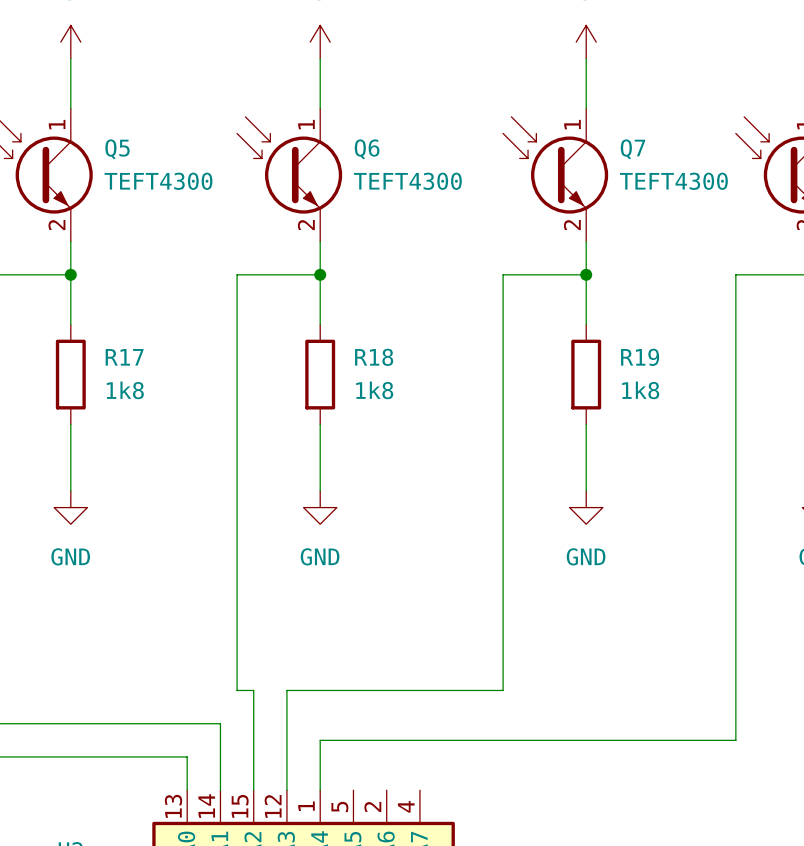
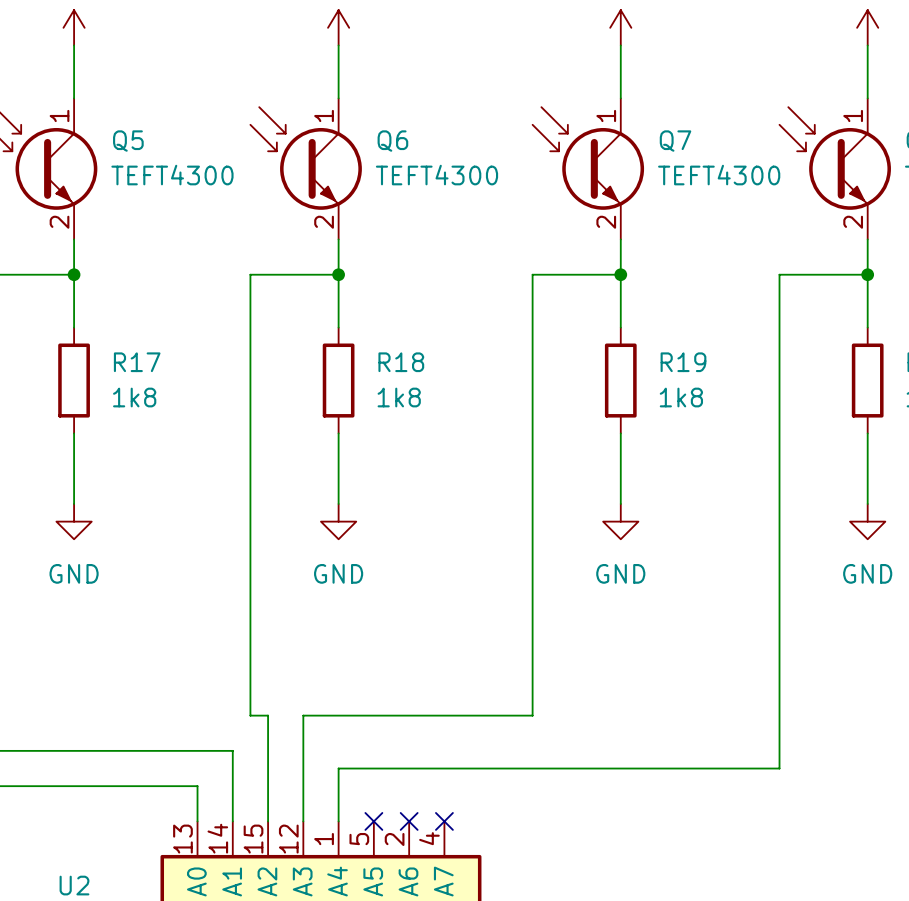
no-connect mark: none -> (373, 821)
no-connect mark: none -> (409, 821)
no-connect mark: none -> (444, 821)

